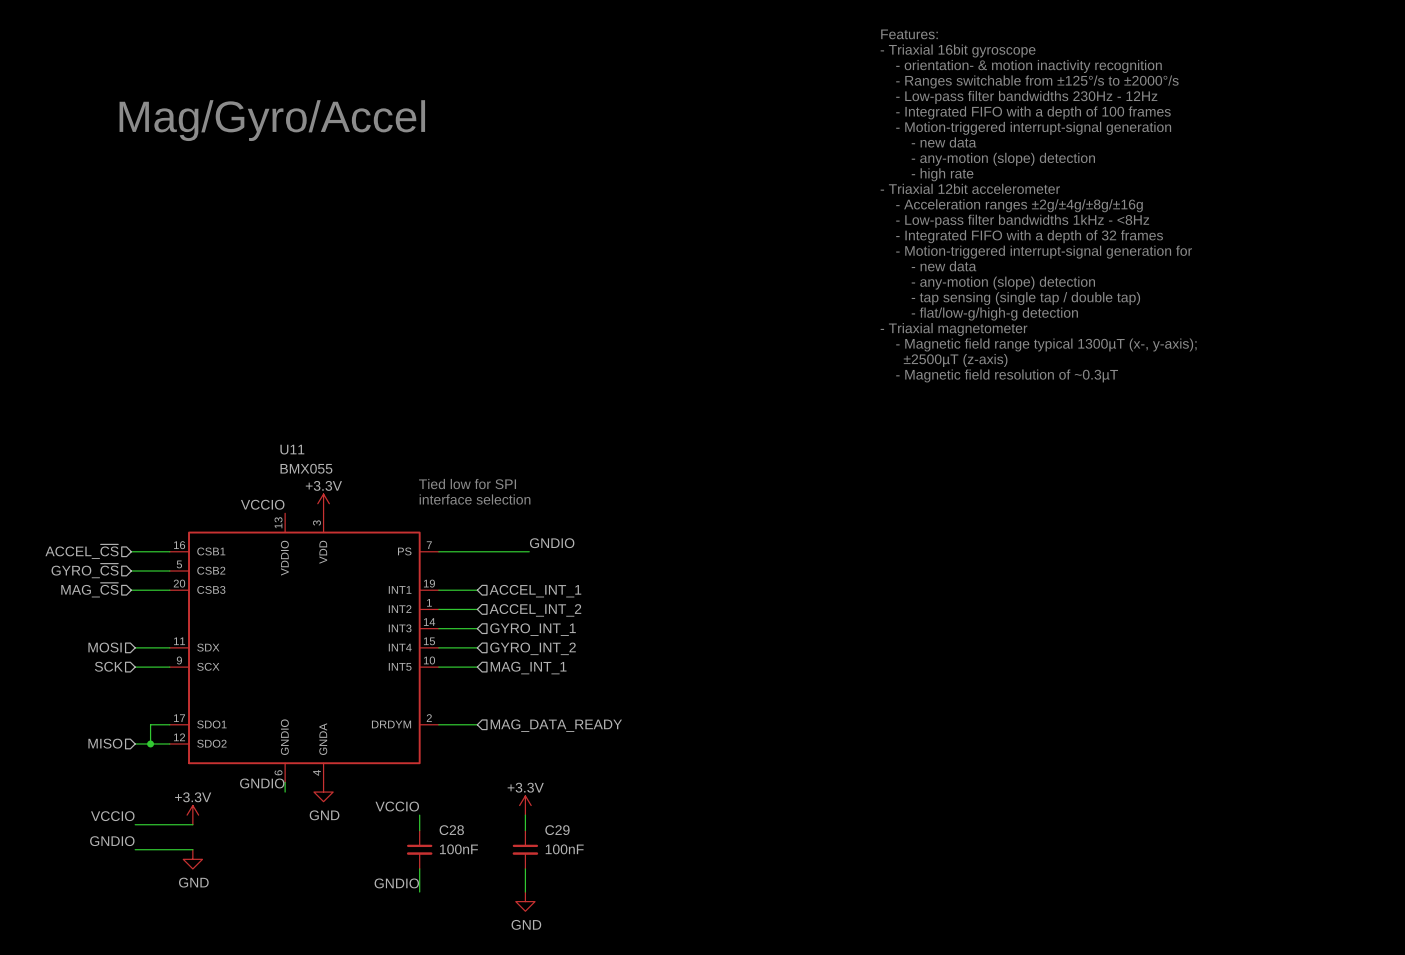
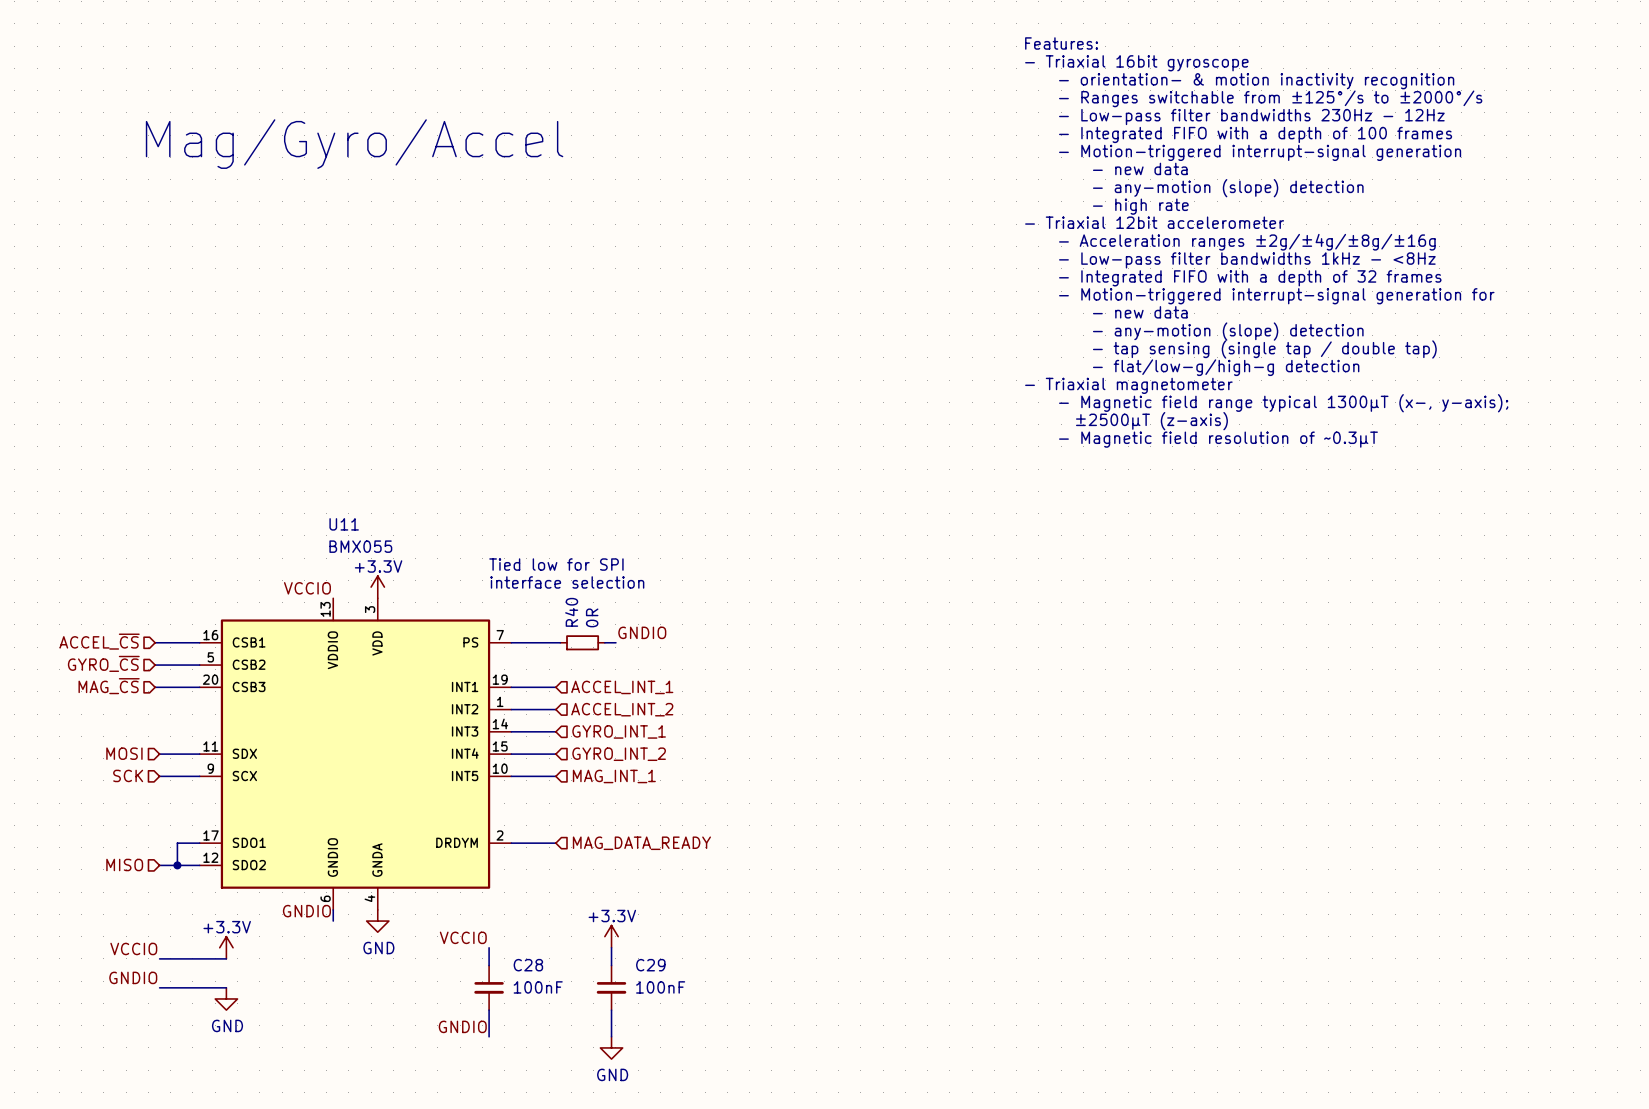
wire: (481, 551) (519, 551) -> none
R40: none -> 0R (582, 642)

